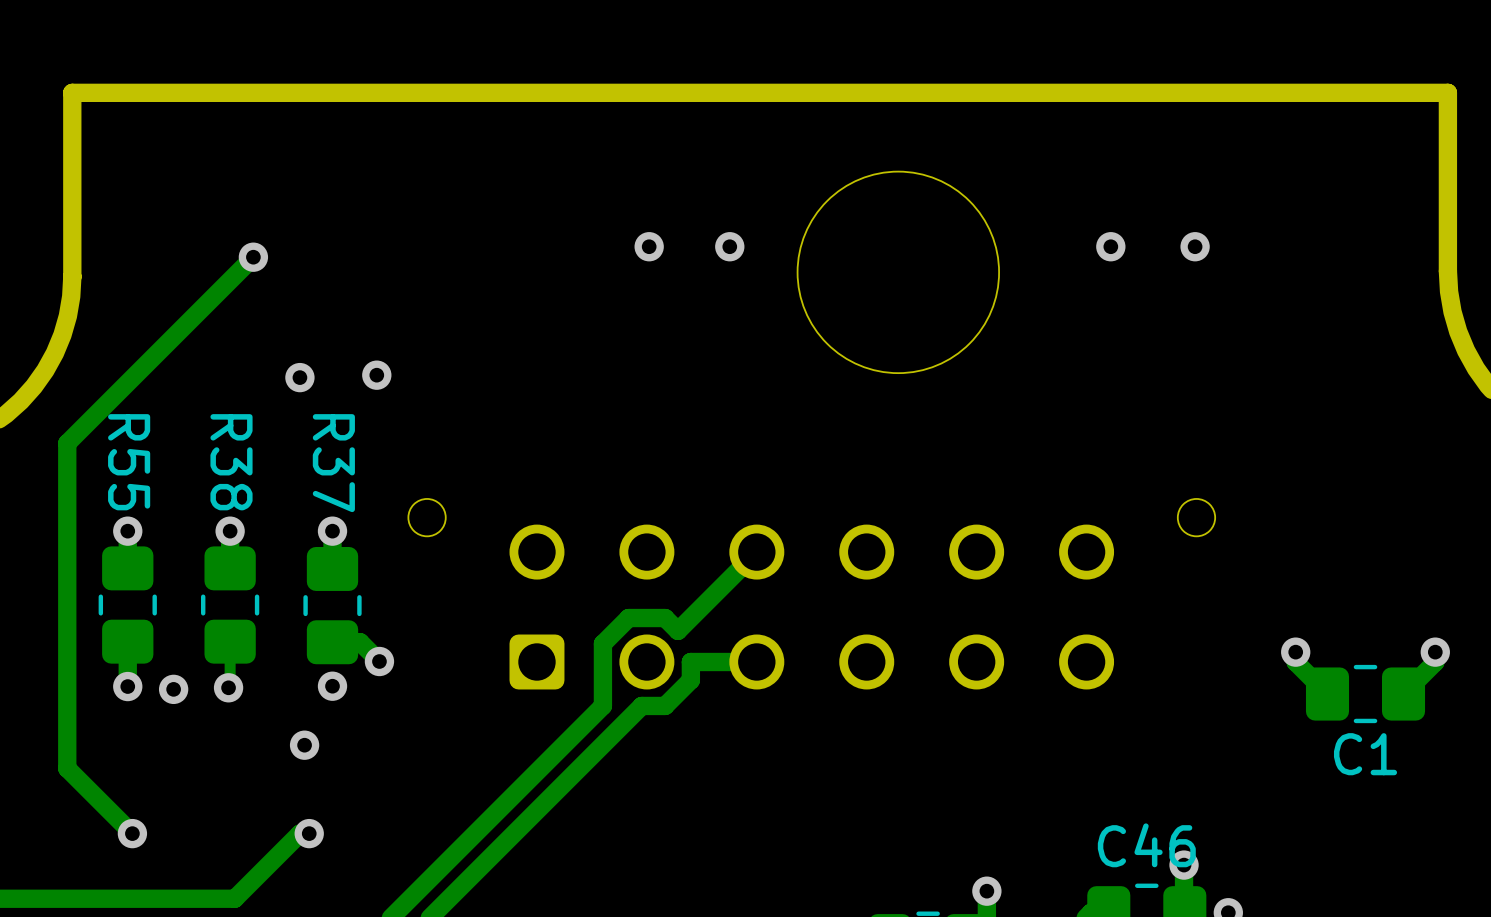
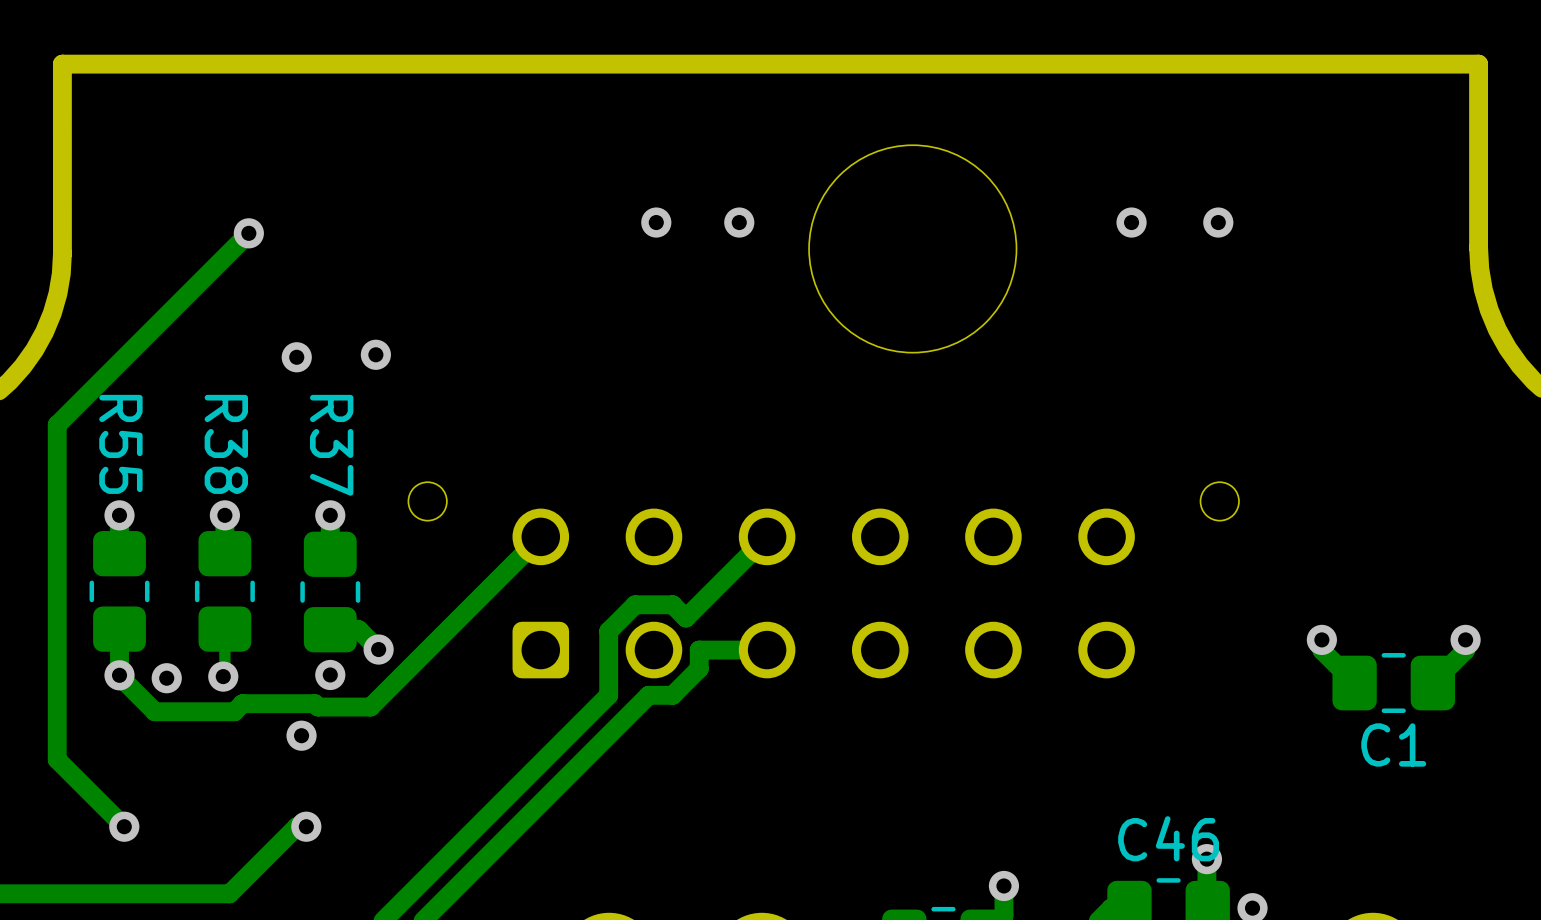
track: none -> (540, 536) (370, 707) (318, 707) (314, 703) (242, 703) (234, 711) (154, 711) (119, 676)

